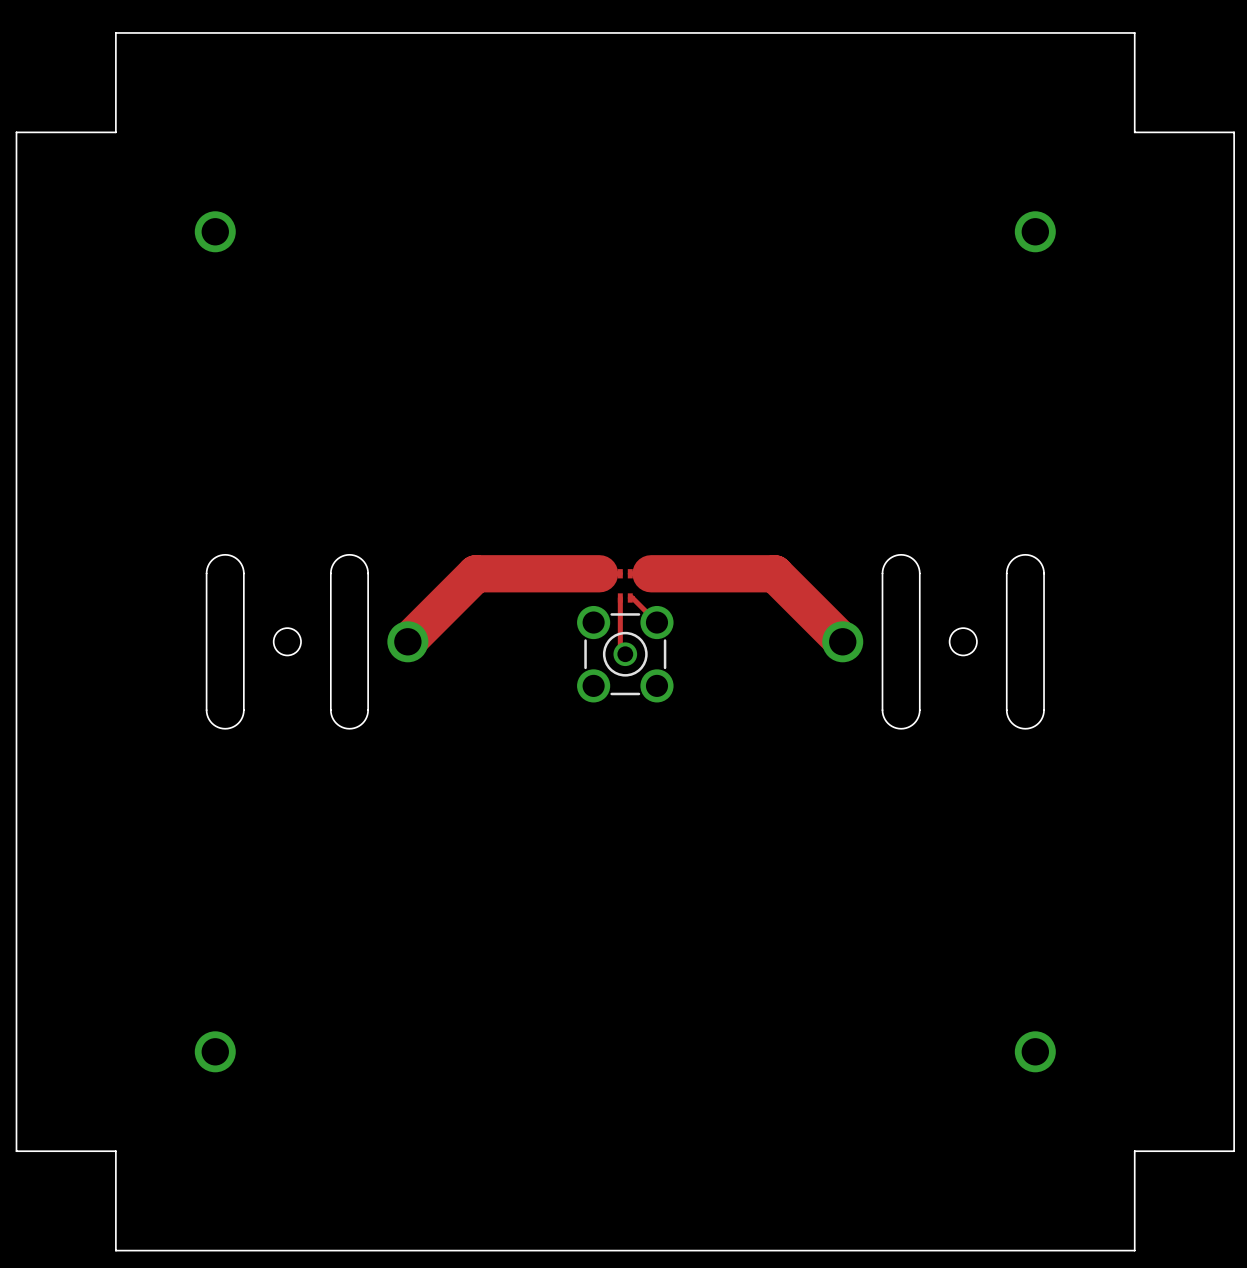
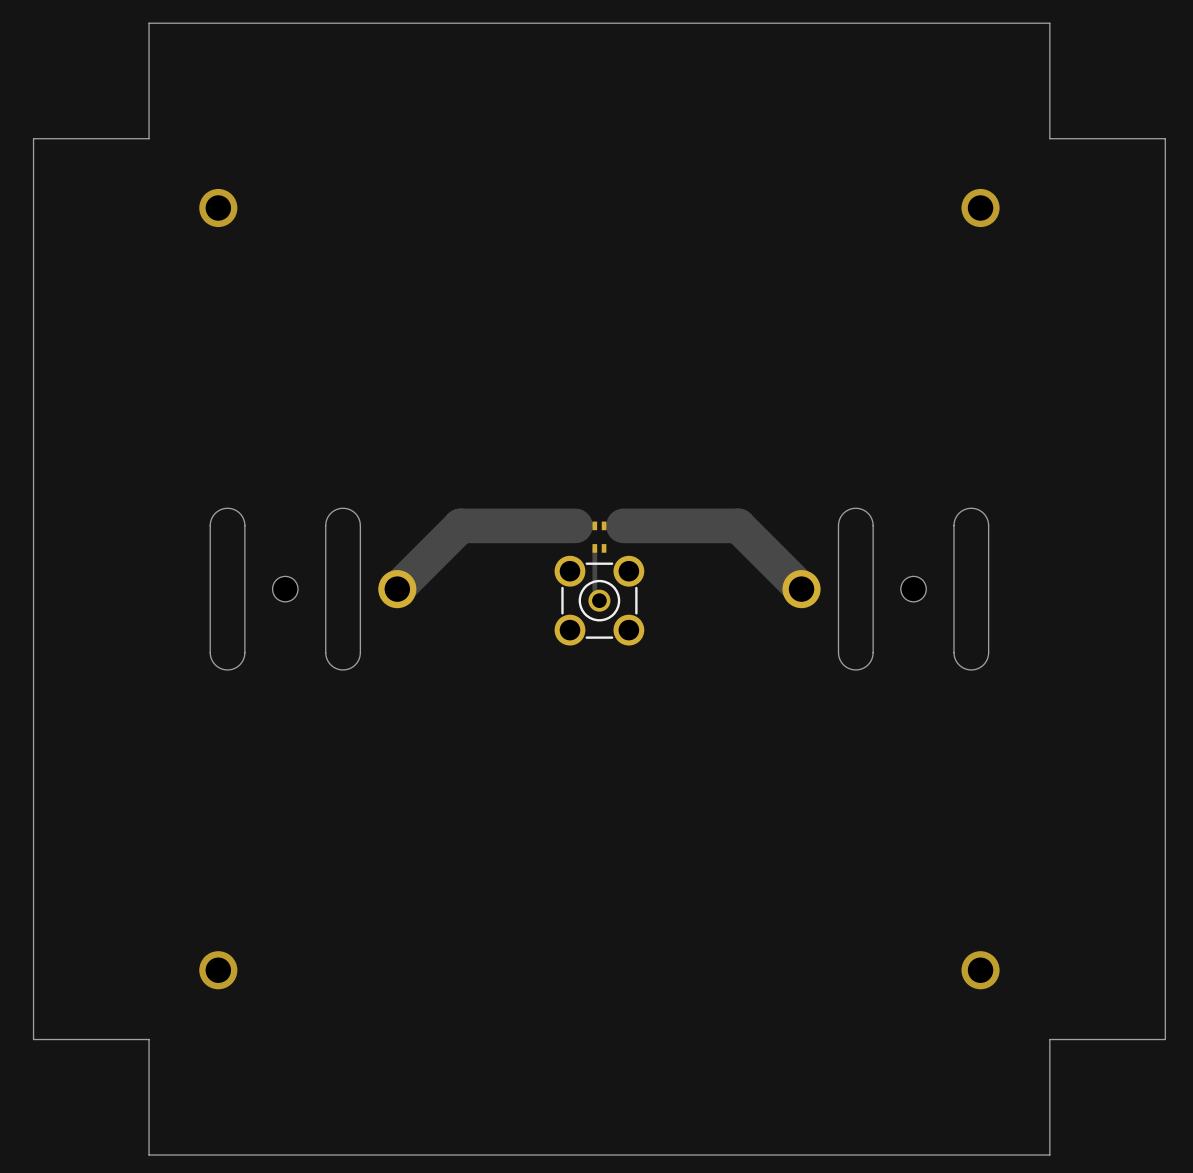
board edge: (140, 32) (115, 32) (115, 132) (16, 132) (16, 157) -> (149, 23) (149, 138) (33, 138)
board edge: (1109, 32) (1134, 32) (1134, 132) (1234, 132) (1234, 157) -> (1049, 23) (1049, 138) (1165, 138)
track: (630, 597) (656, 622) -> none
board edge: (16, 1126) (16, 1151) (115, 1151) (115, 1250) (140, 1250) -> (33, 1039) (149, 1039) (149, 1155)
board edge: (1234, 1126) (1234, 1151) (1134, 1151) (1134, 1250) (1109, 1250) -> (1165, 1039) (1049, 1039) (1049, 1155)

